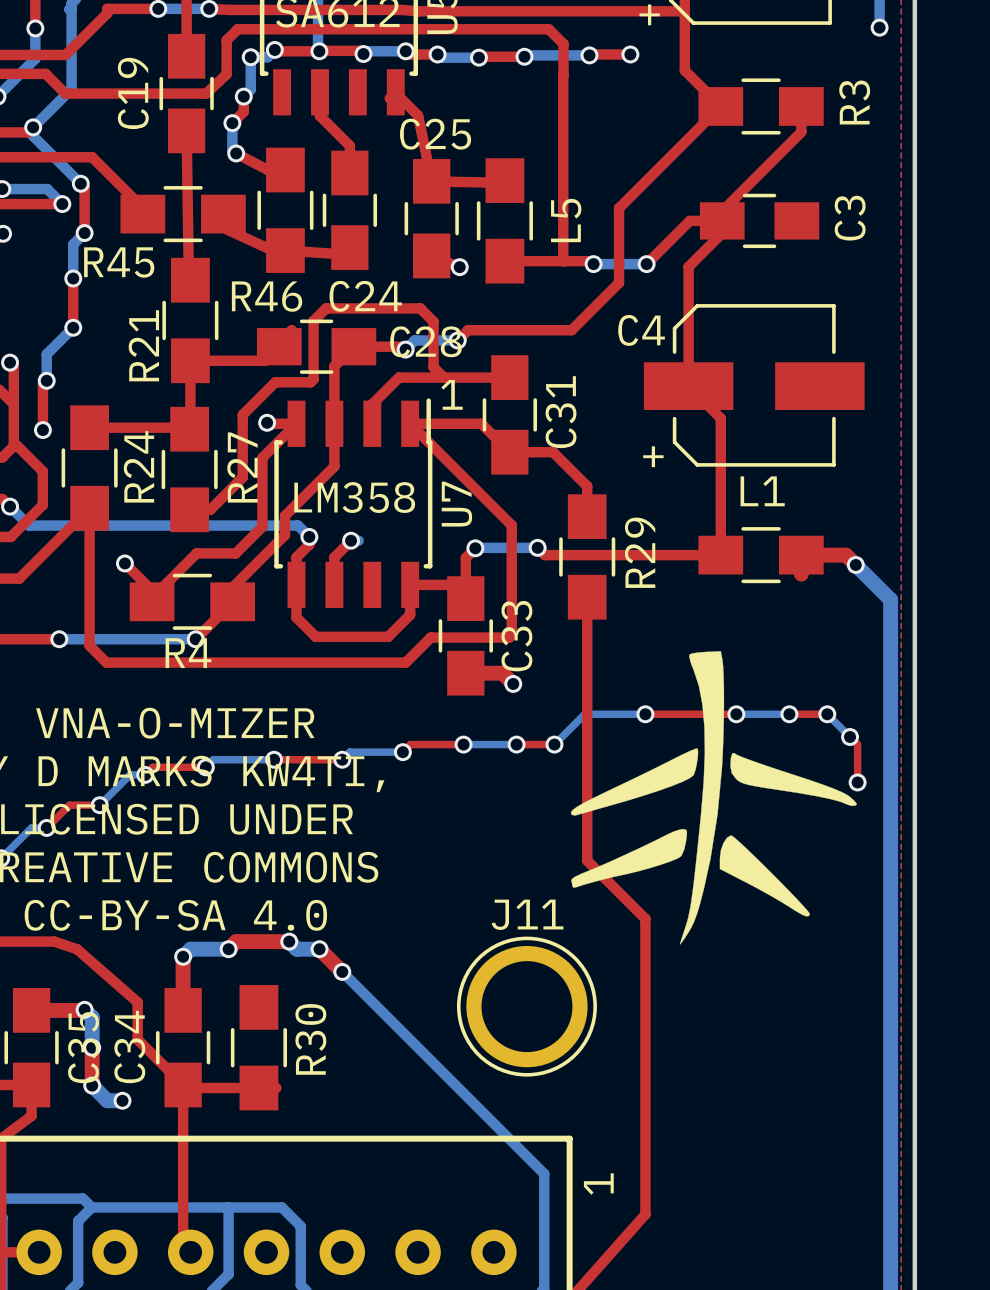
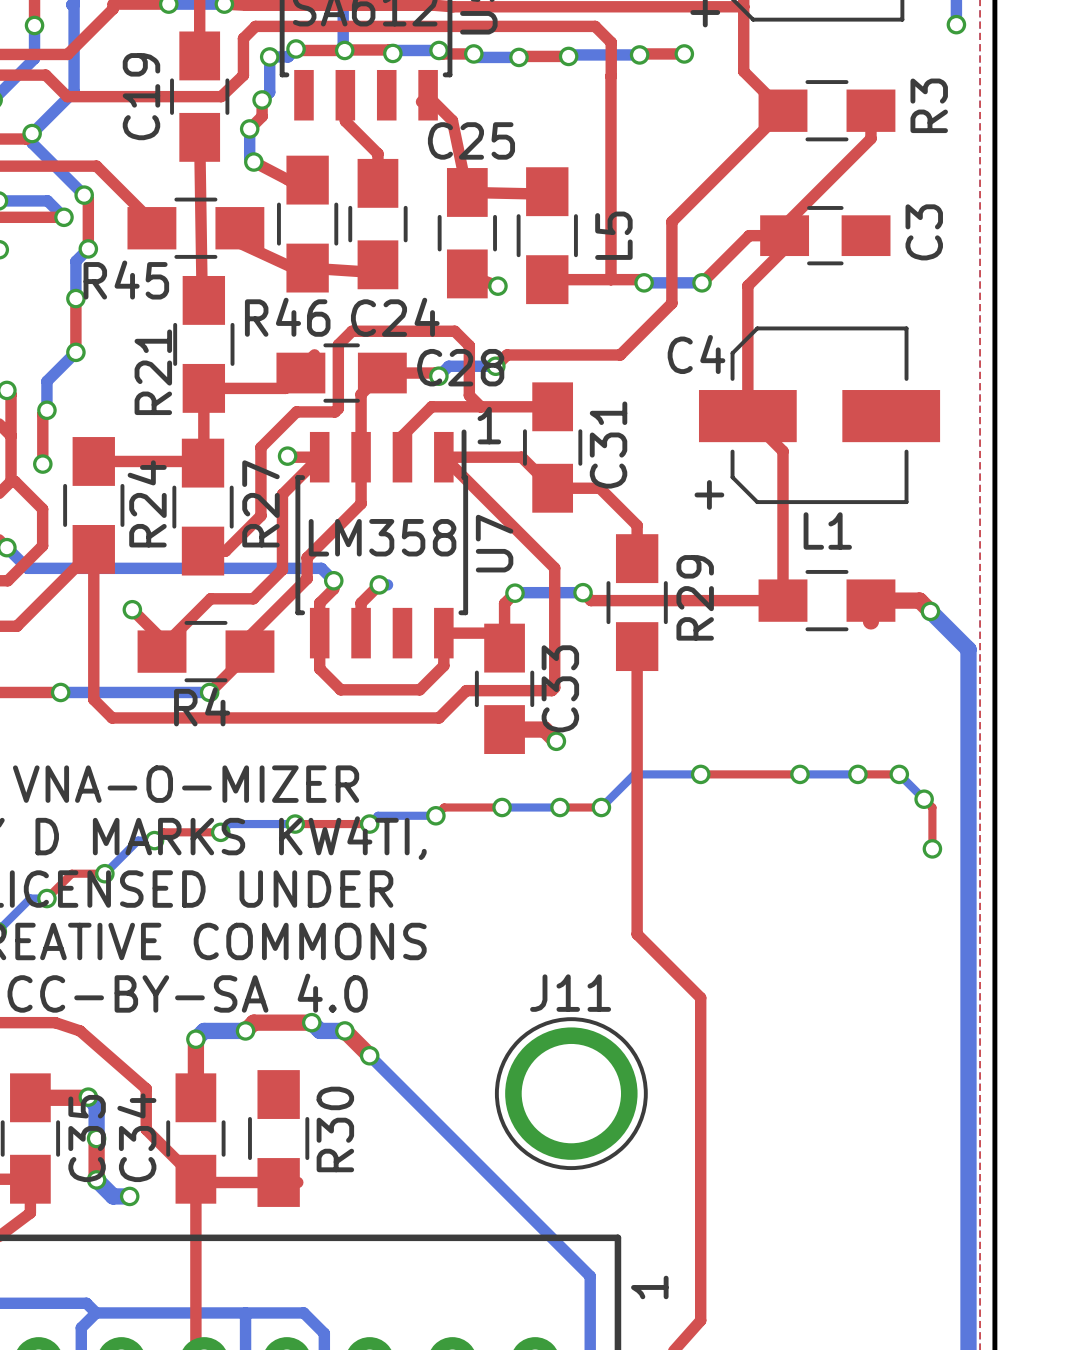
drawing: [570, 651, 857, 945] -> none

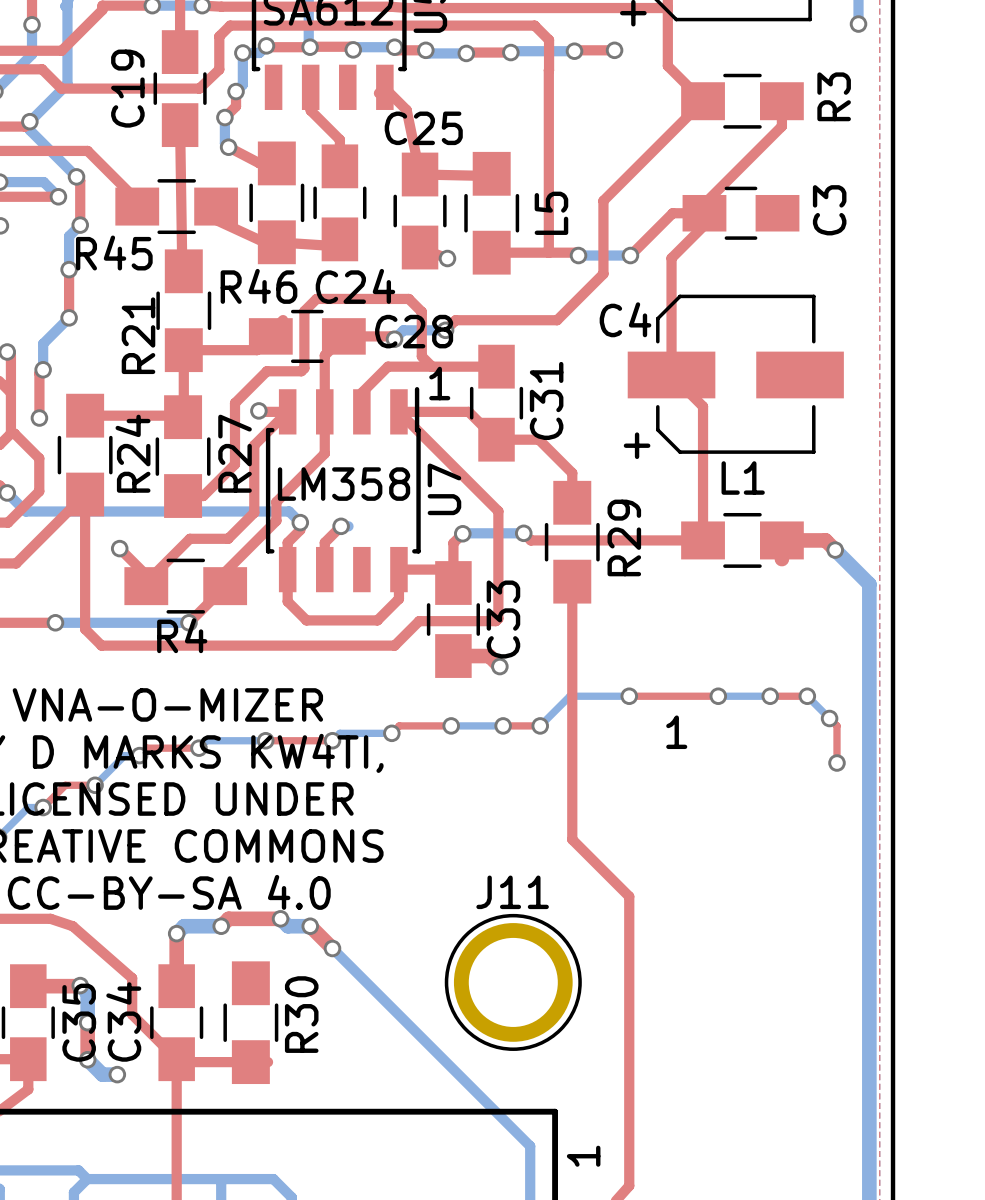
text: none -> 1 (676, 732)

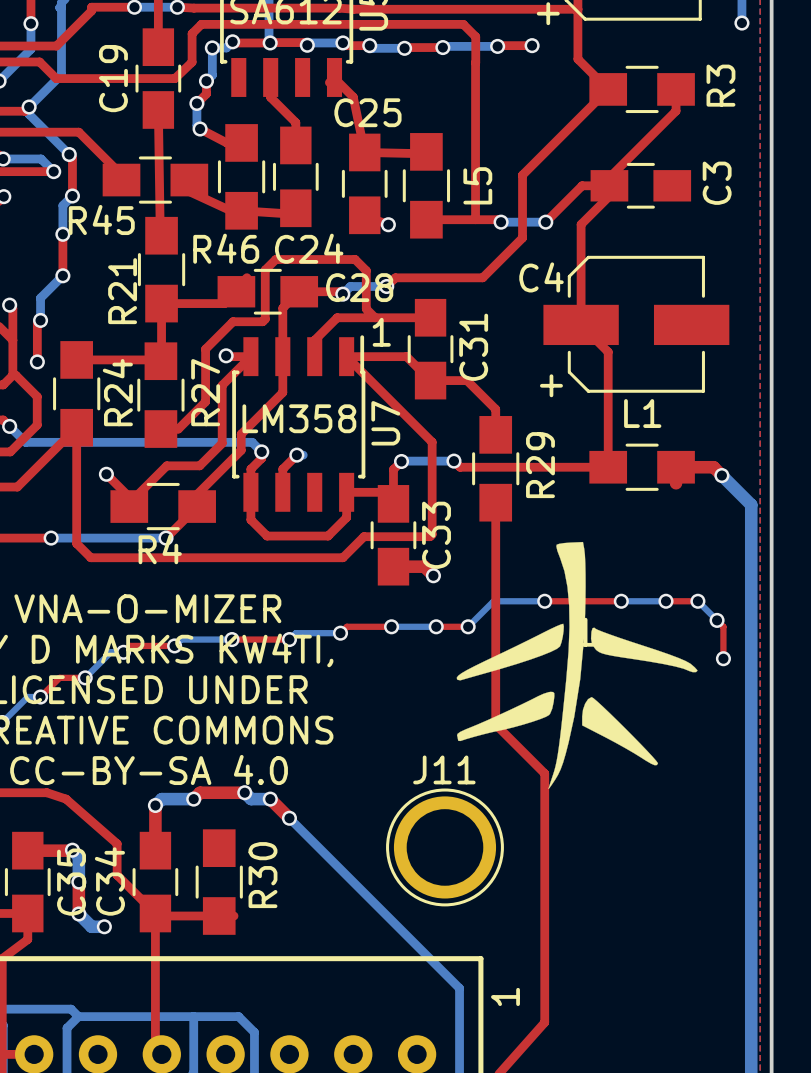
drawing: none -> [456, 541, 698, 790]

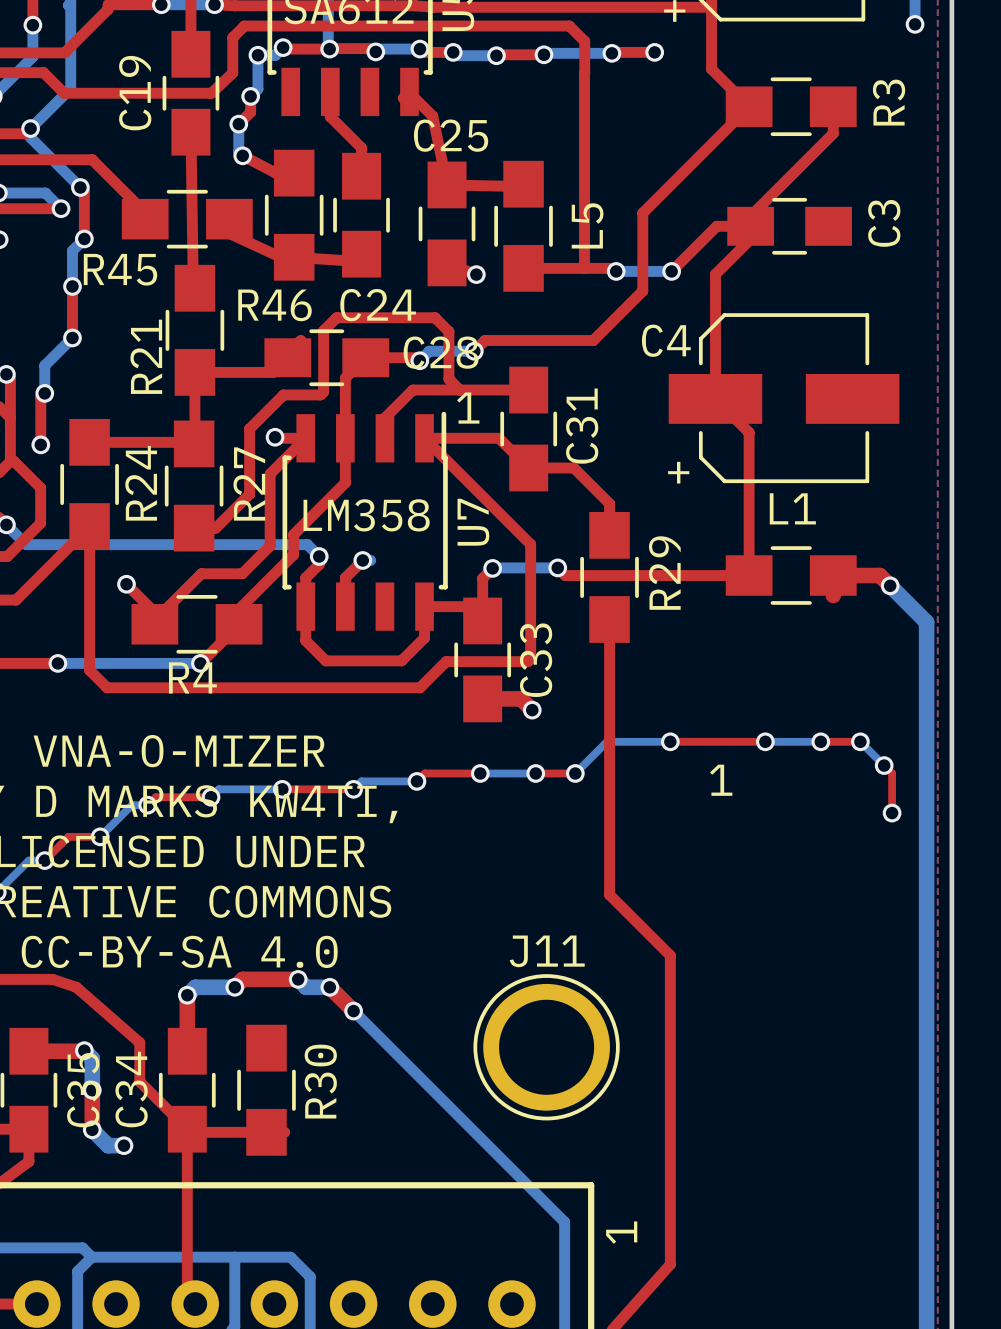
drawing: [456, 541, 698, 790] -> none

